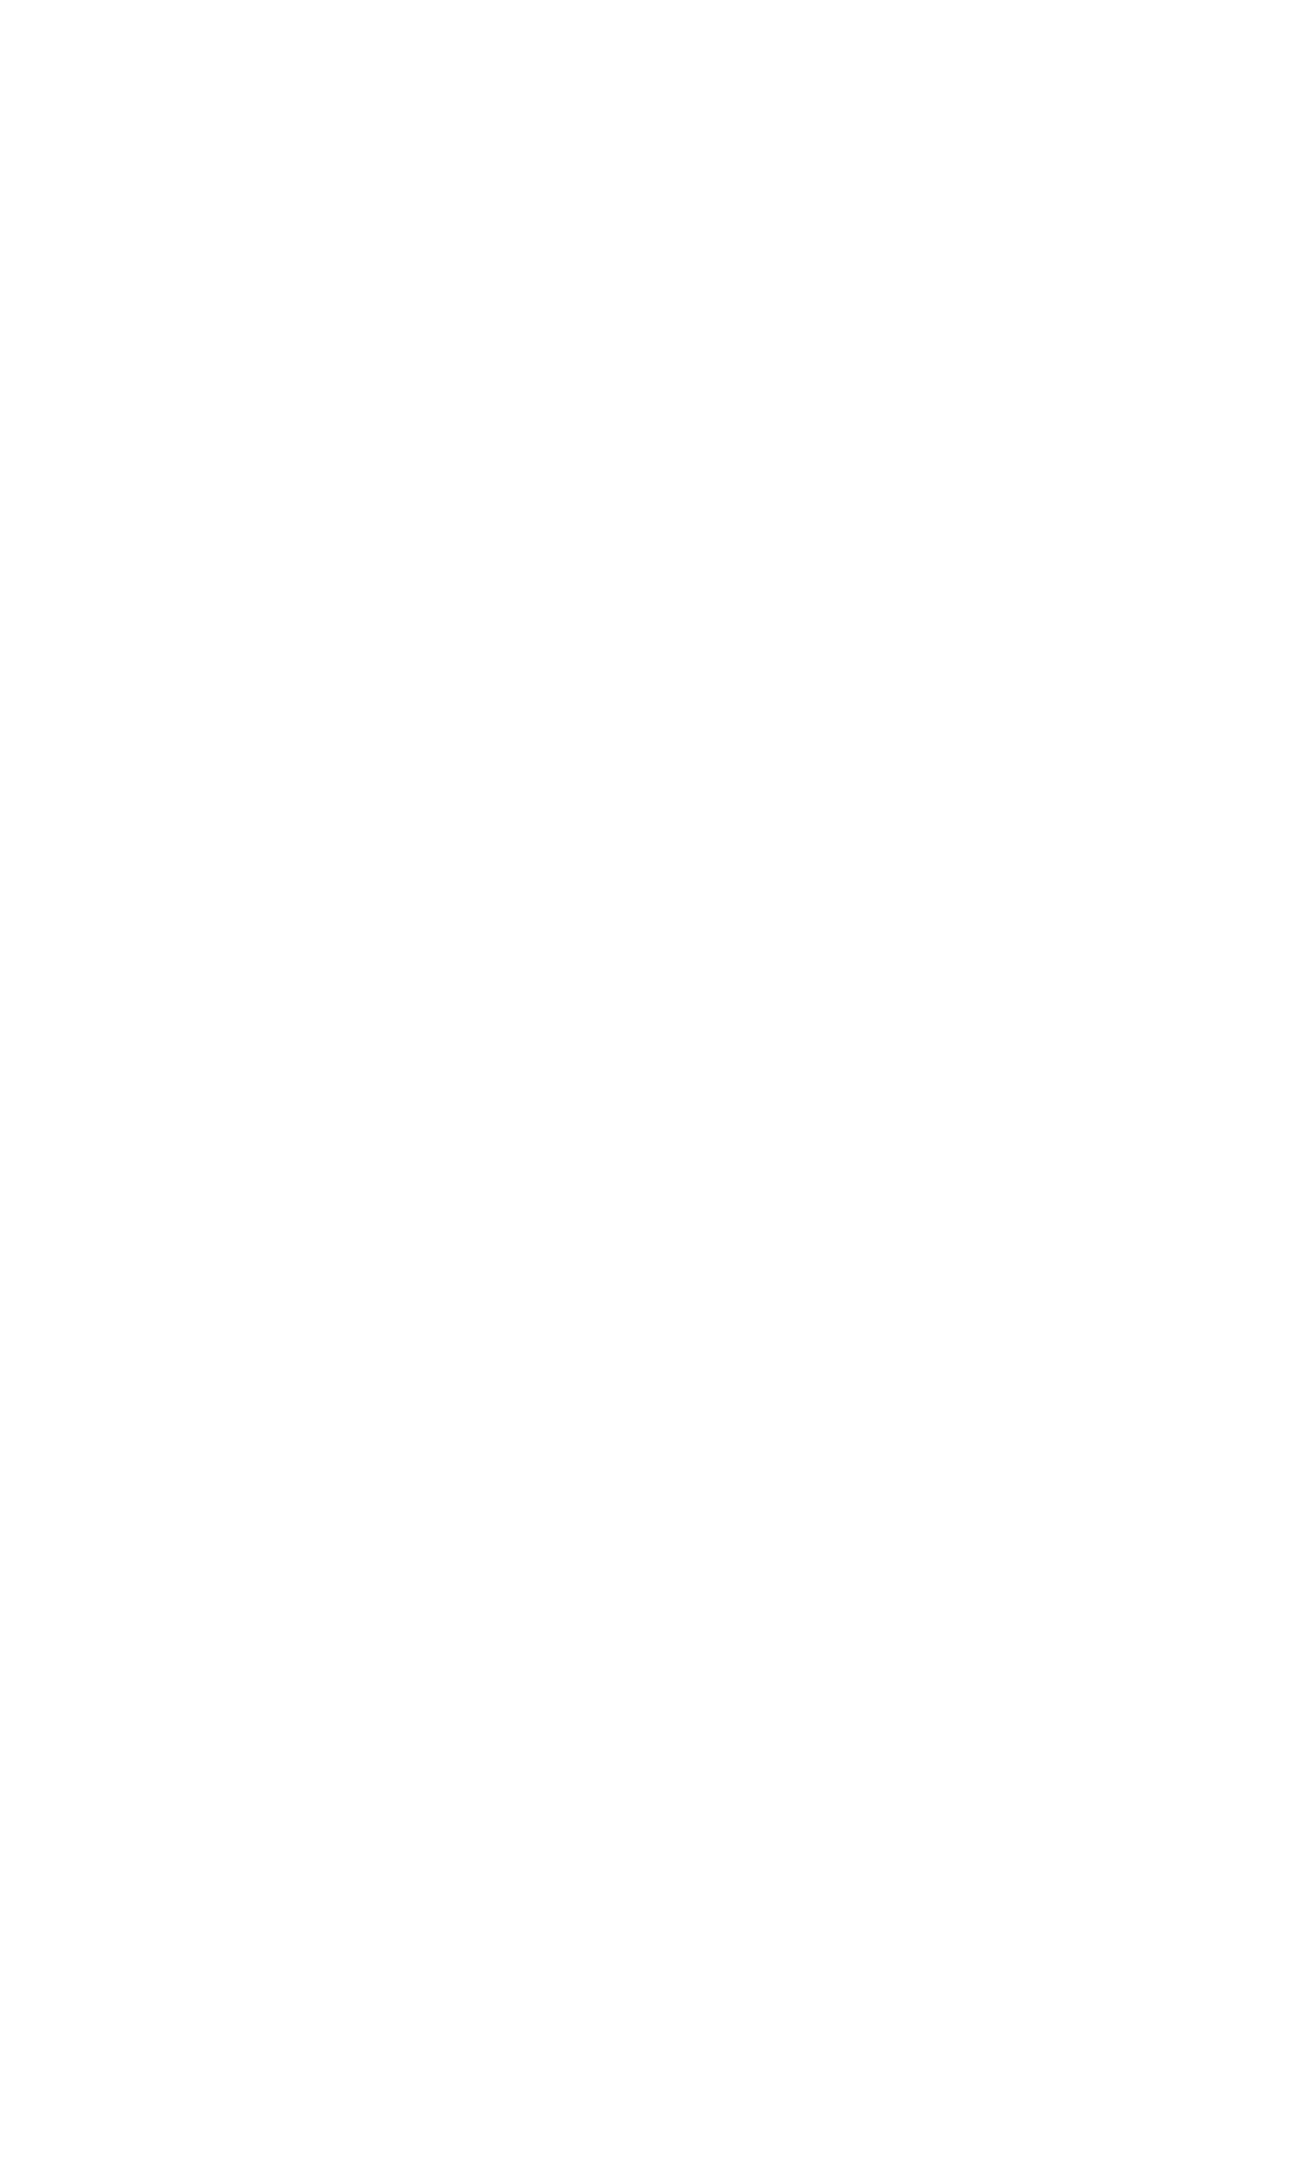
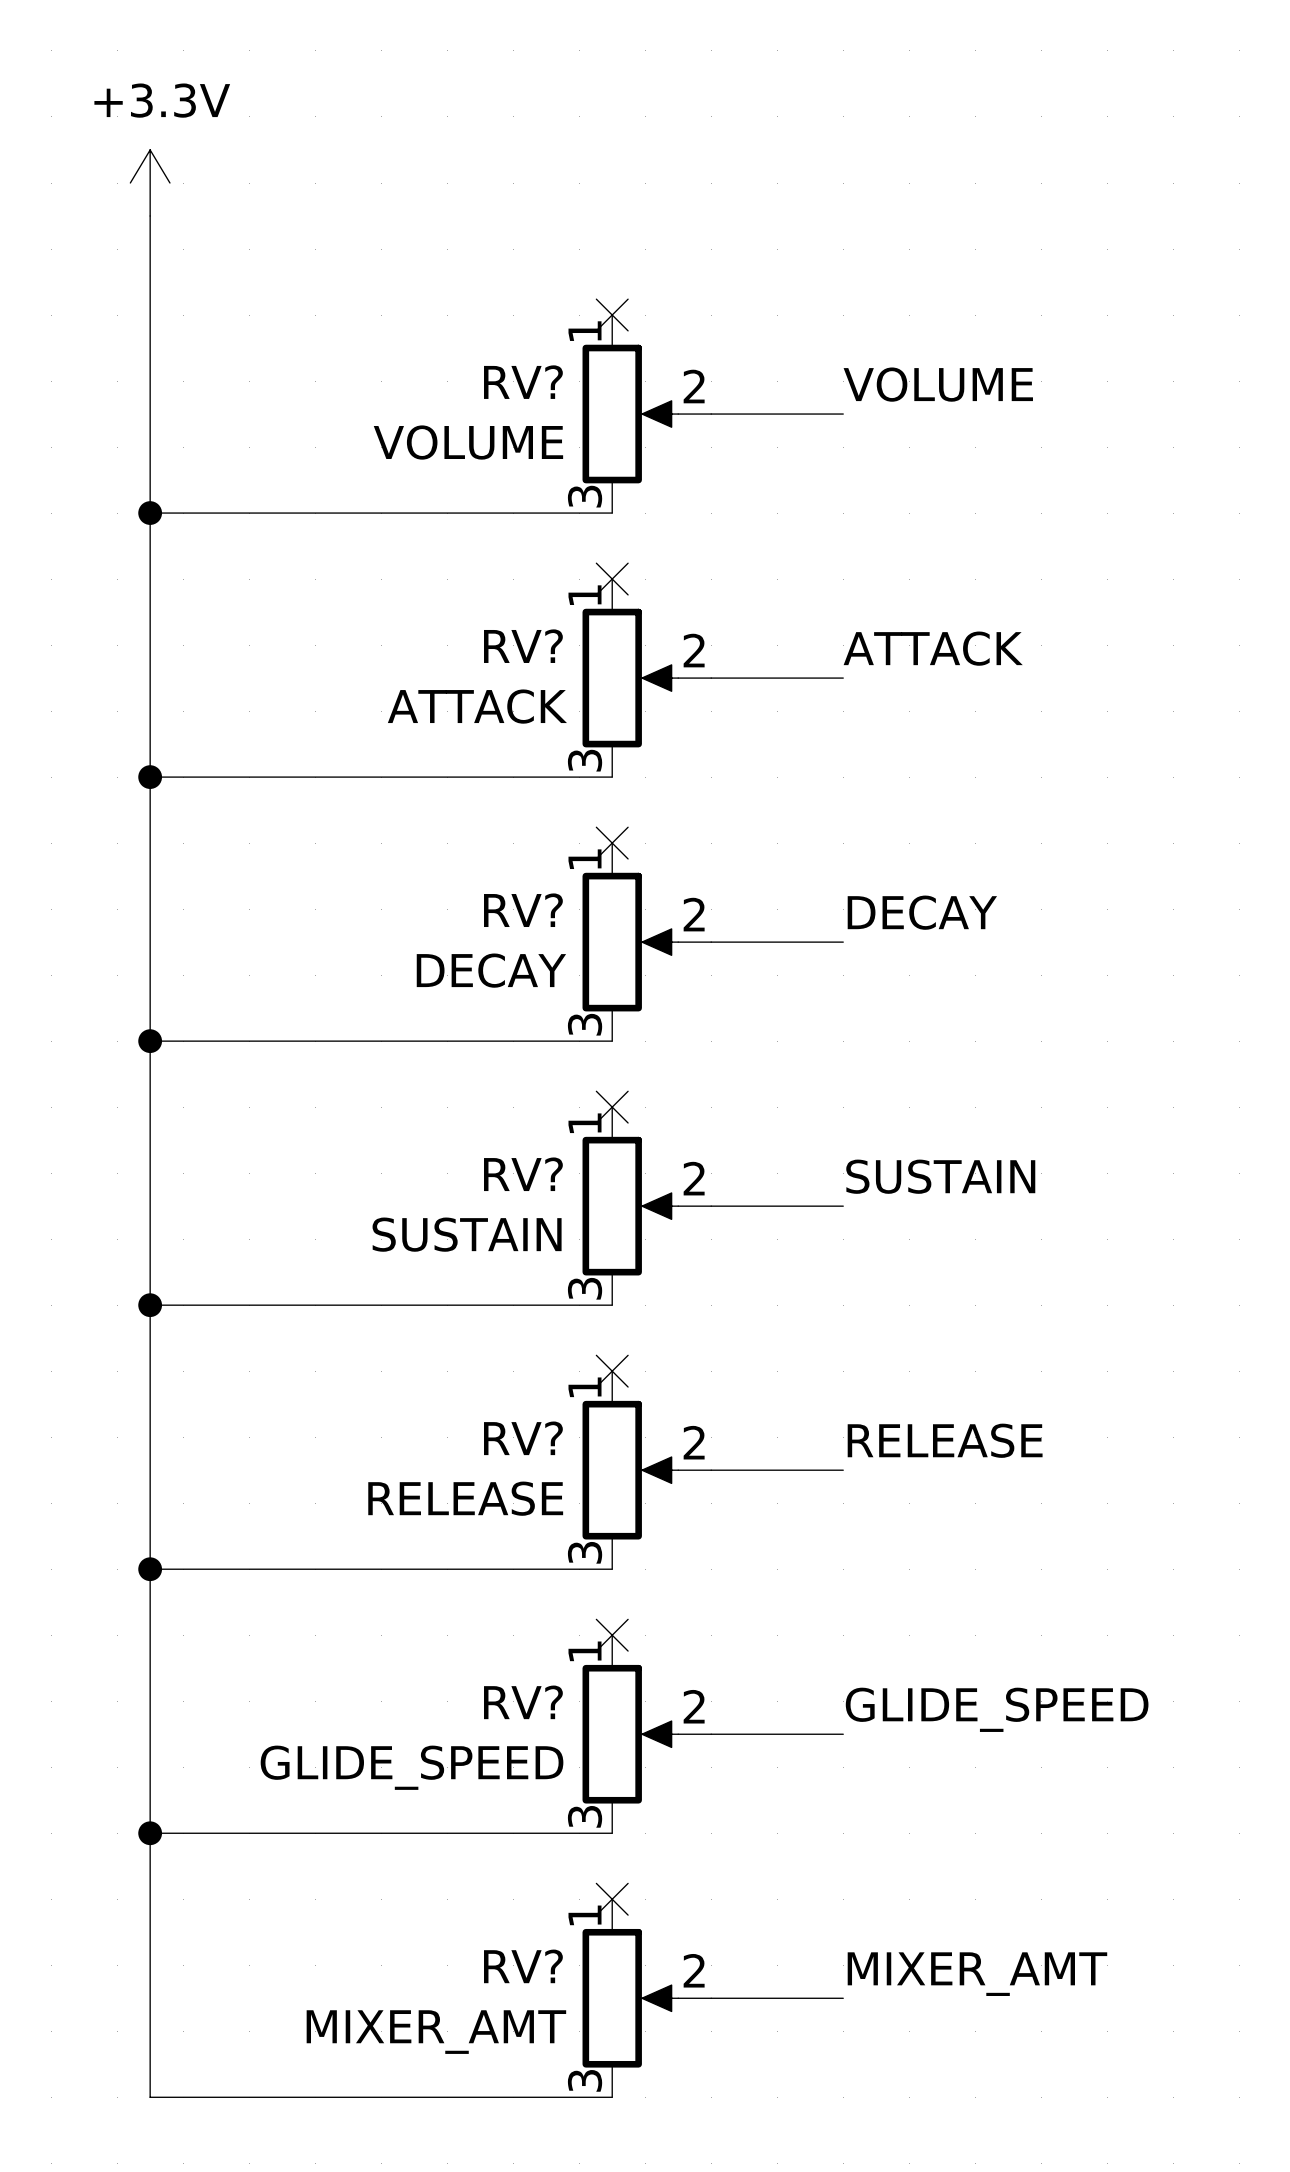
power symbol: none -> +3.3V (150, 183)
wire: none -> (150, 216) (150, 2097) (612, 2097)
no-connect mark: none -> (612, 315)
label: none -> VOLUME (938, 384)
RV?: none -> VOLUME (646, 414)
wire: none -> (711, 414) (843, 414)
wire: none -> (150, 513) (612, 513)
junction: none -> (150, 513)
no-connect mark: none -> (612, 579)
label: none -> ATTACK (933, 648)
RV?: none -> ATTACK (646, 678)
wire: none -> (711, 678) (843, 678)
wire: none -> (150, 777) (612, 777)
junction: none -> (150, 777)
no-connect mark: none -> (612, 843)
label: none -> DECAY (922, 912)
RV?: none -> DECAY (646, 942)
wire: none -> (711, 942) (843, 942)
wire: none -> (150, 1041) (612, 1041)
junction: none -> (150, 1041)
no-connect mark: none -> (612, 1107)
label: none -> SUSTAIN (940, 1176)
RV?: none -> SUSTAIN (646, 1206)
wire: none -> (711, 1206) (843, 1206)
wire: none -> (150, 1305) (612, 1305)
junction: none -> (150, 1305)
no-connect mark: none -> (612, 1371)
label: none -> RELEASE (945, 1440)
RV?: none -> RELEASE (646, 1470)
wire: none -> (711, 1470) (843, 1470)
wire: none -> (150, 1569) (612, 1569)
junction: none -> (150, 1569)
no-connect mark: none -> (612, 1635)
label: none -> GLIDE_SPEED (997, 1709)
RV?: none -> GLIDE_SPEED (646, 1734)
wire: none -> (711, 1734) (843, 1734)
wire: none -> (150, 1833) (612, 1833)
junction: none -> (150, 1833)
no-connect mark: none -> (612, 1899)
label: none -> MIXER_AMT (977, 1974)
RV?: none -> MIXER_AMT (646, 1998)
wire: none -> (711, 1998) (843, 1998)

